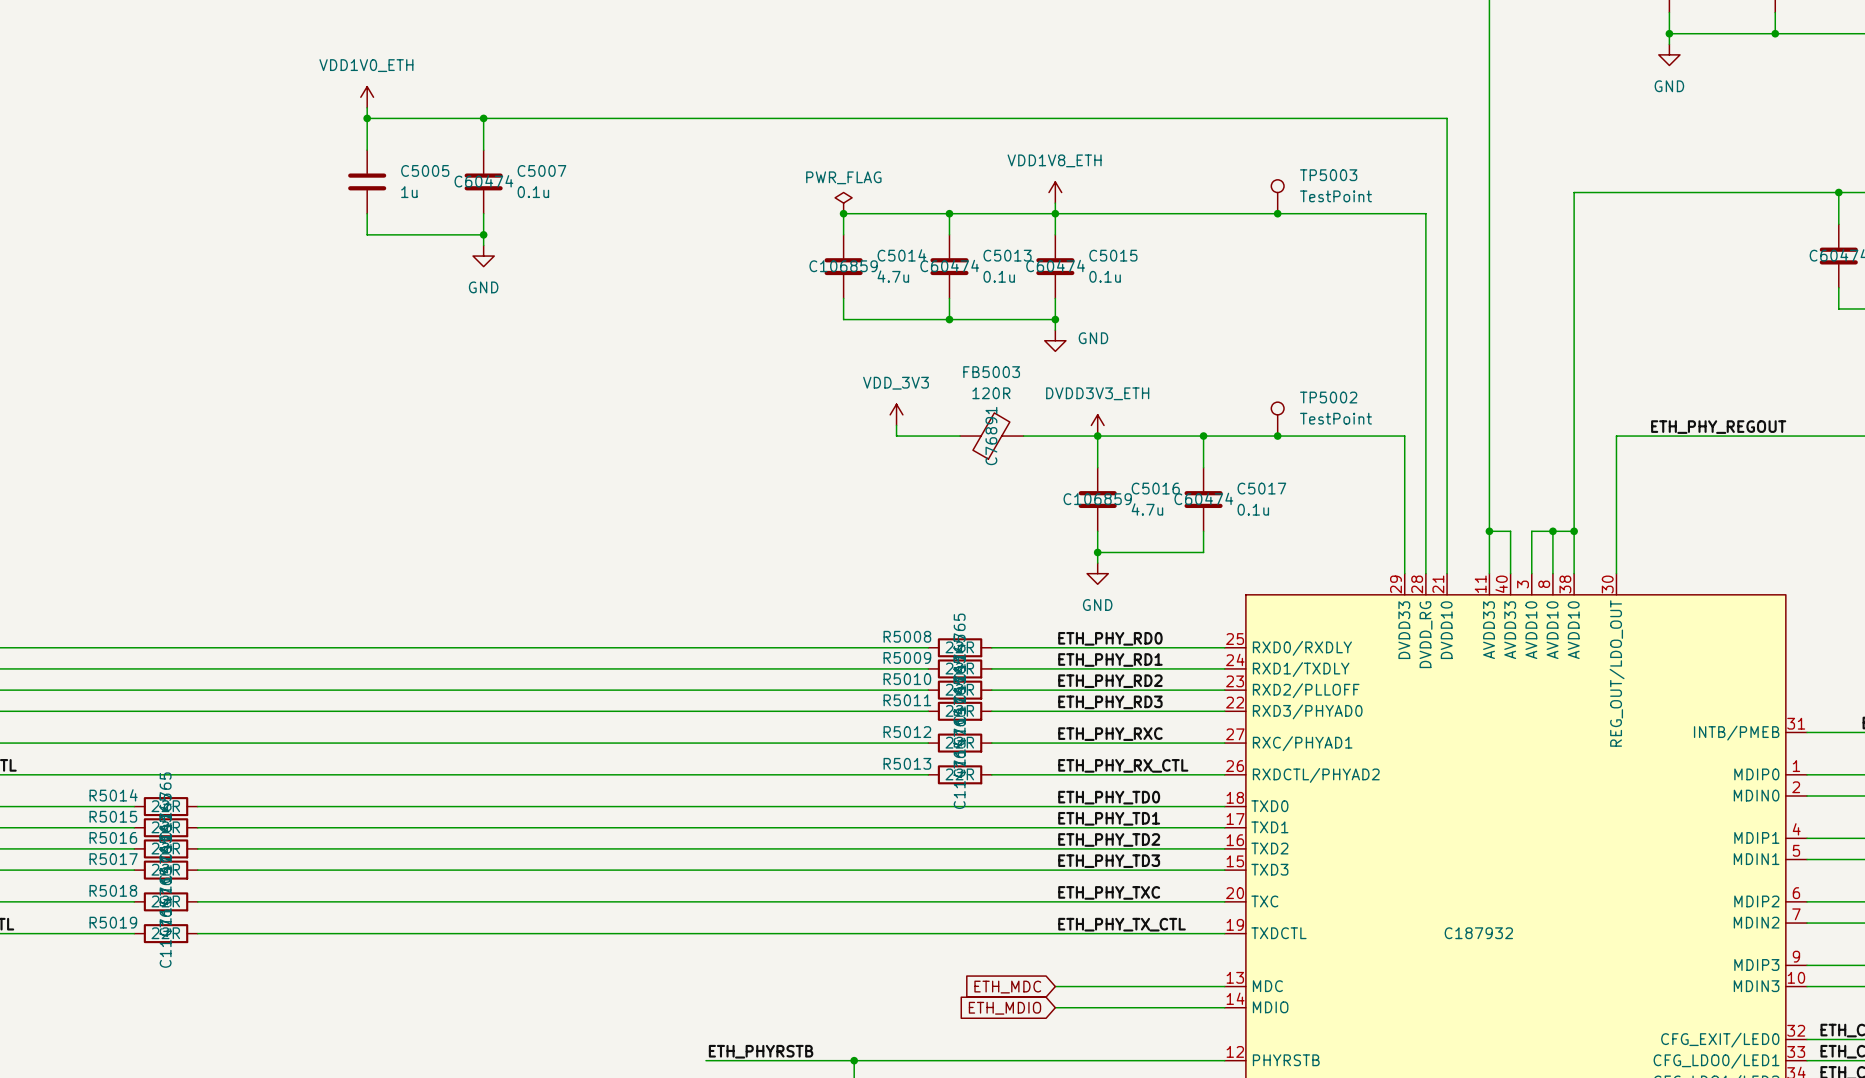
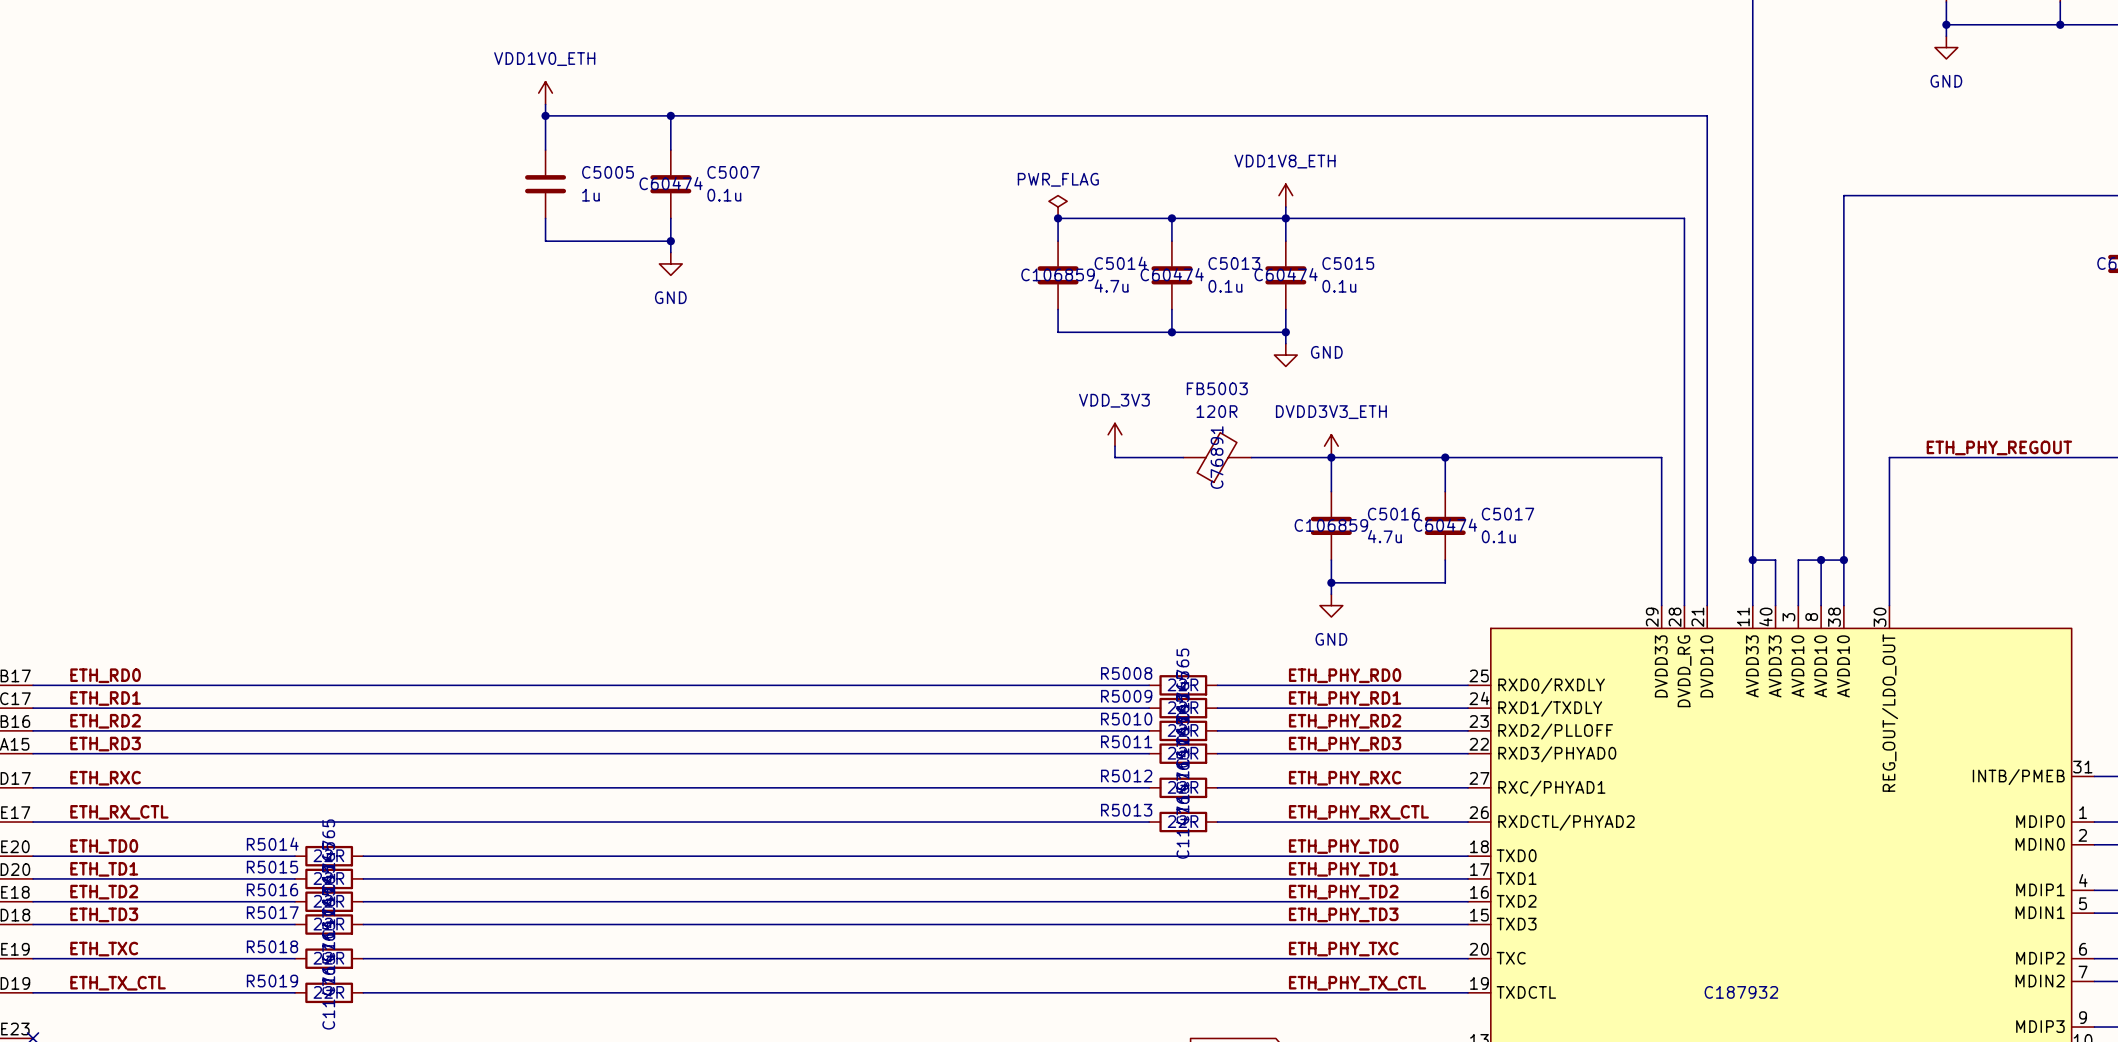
TP5003: TestPoint (1277, 196) -> none
junction: (1277, 213) -> none
TP5002: TestPoint (1277, 419) -> none
junction: (1277, 436) -> none

